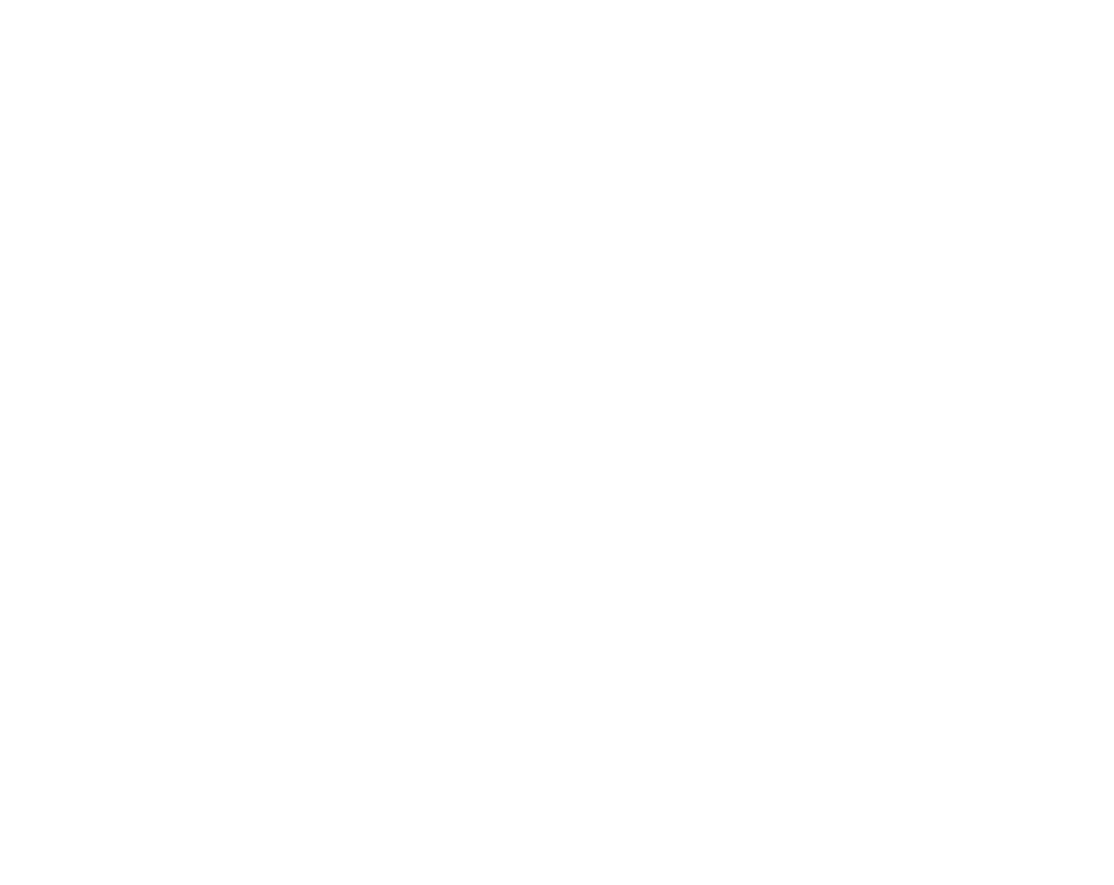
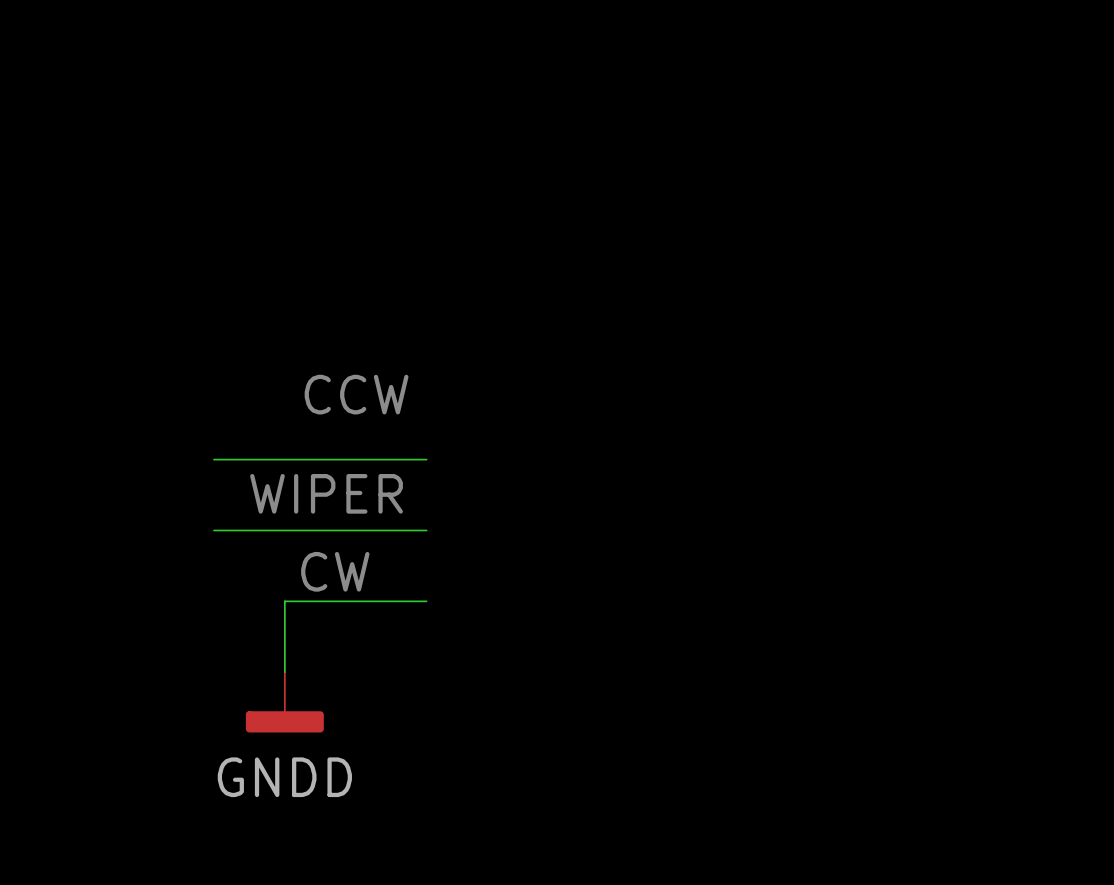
text: none -> CCW (356, 394)
wire: none -> (213, 459) (426, 459)
text: none -> WIPER (326, 493)
wire: none -> (213, 530) (426, 530)
text: none -> CW (335, 571)
wire: none -> (426, 601) (284, 601) (284, 672)
power symbol: none -> GNDD (284, 702)

